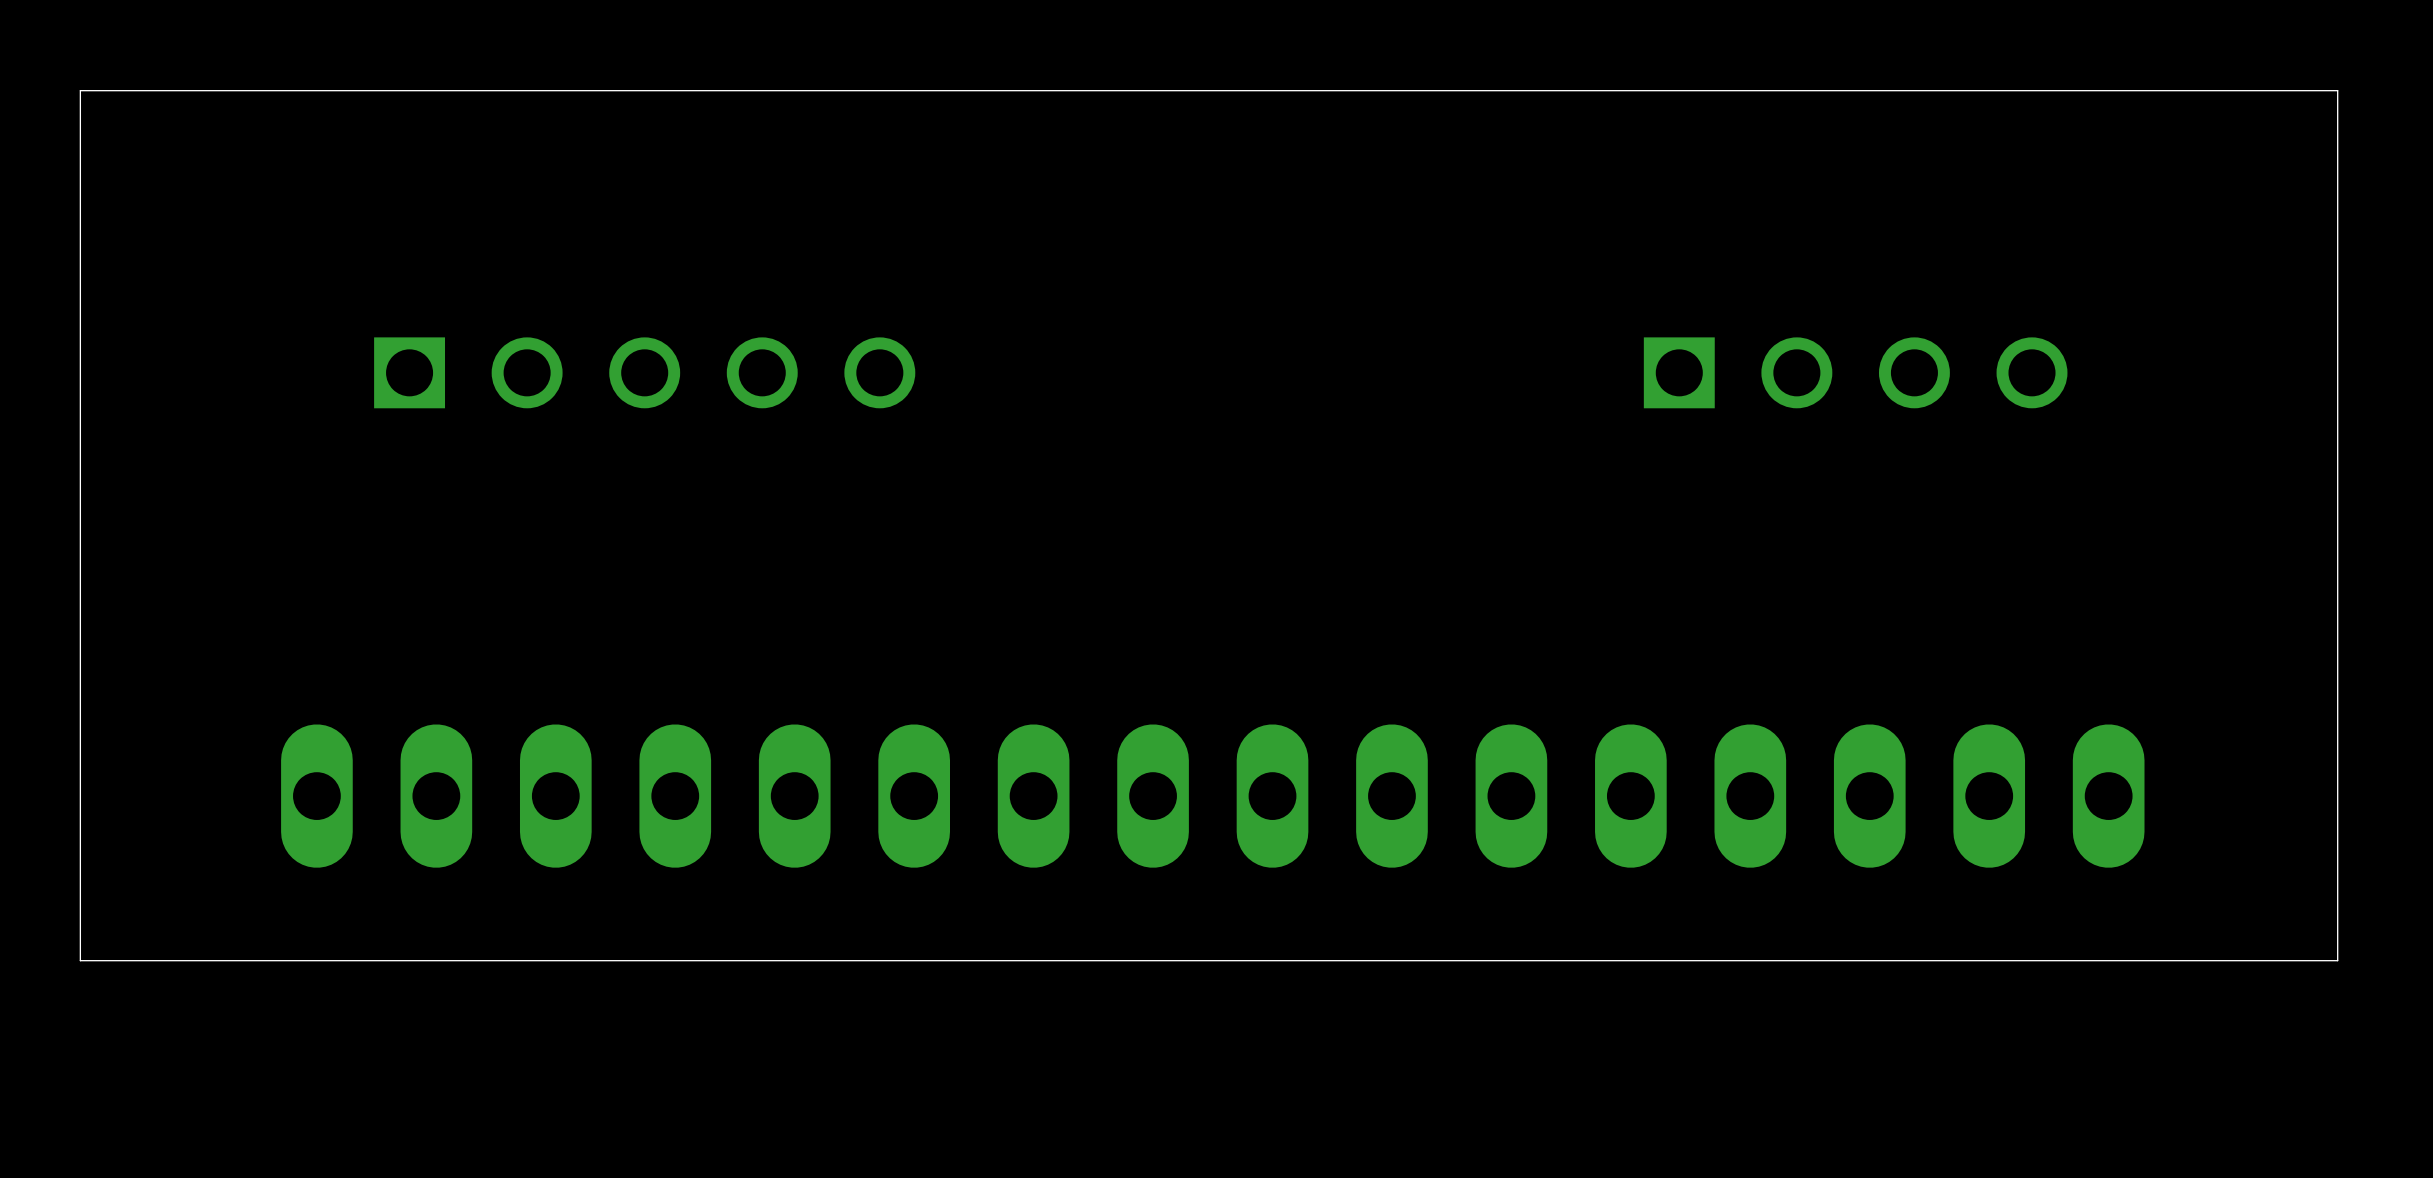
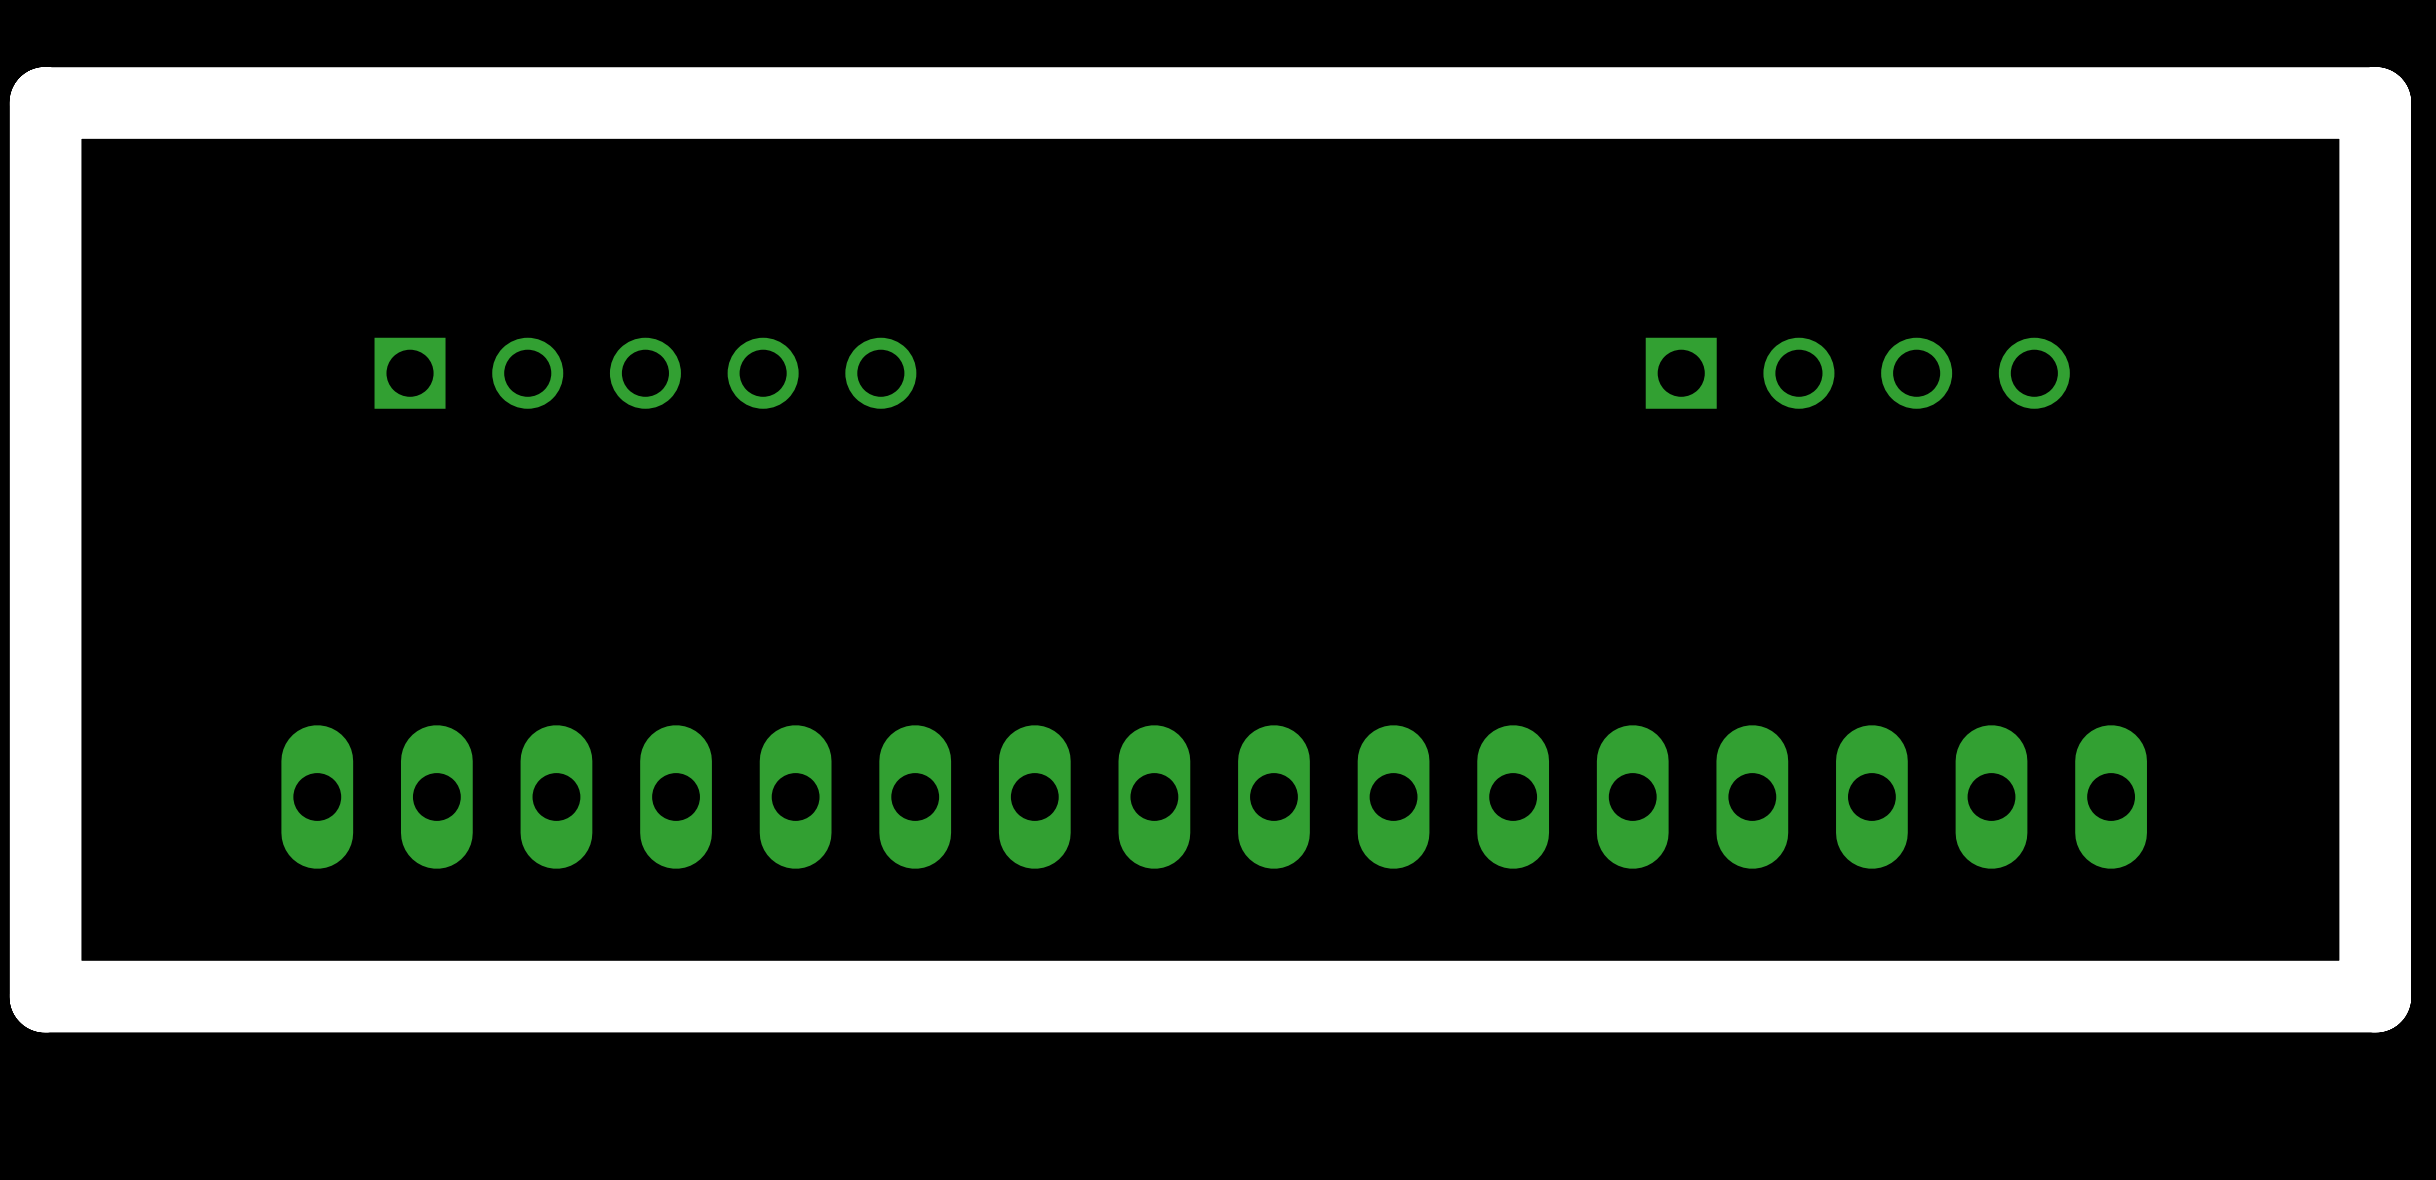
board edge: none -> (2375, 102) (2375, 997) (45, 997) (45, 102) (2375, 102)
board edge: (2337, 137) (2337, 90) (80, 90) (80, 137) -> (2340, 137) (80, 137)

